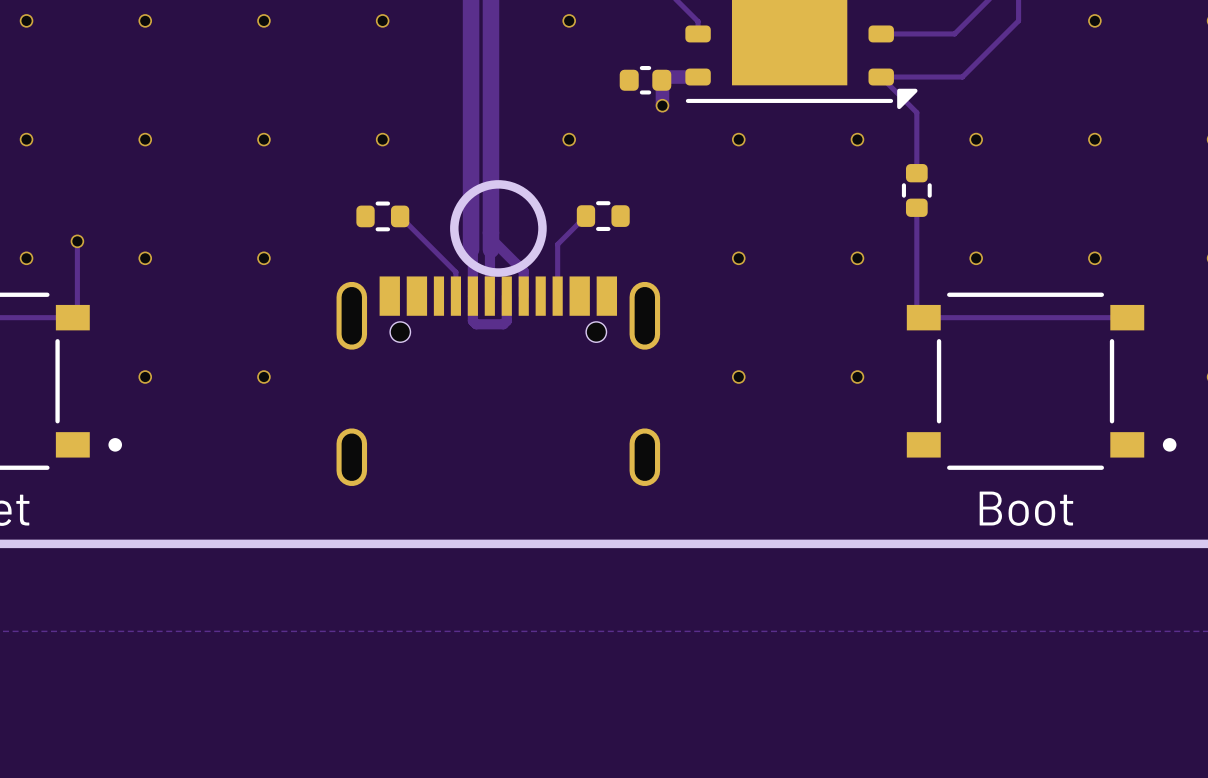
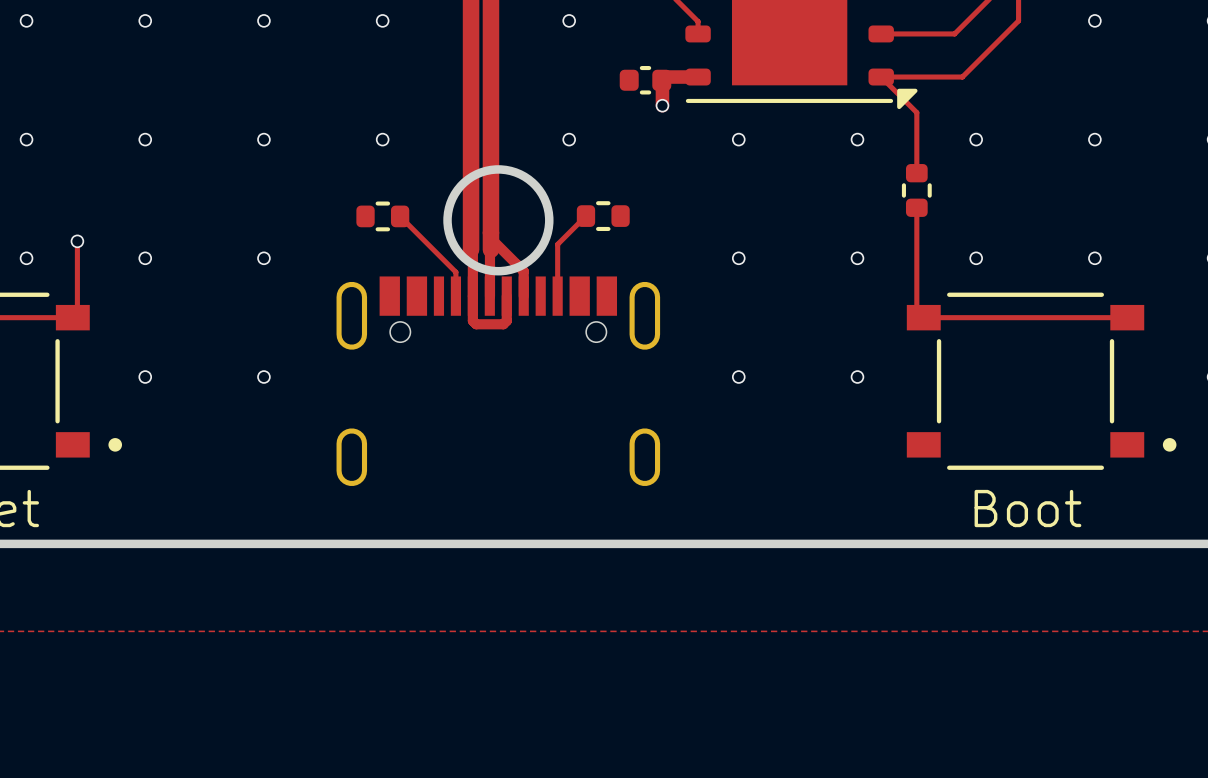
round board edge size: [450, 180, 547, 277] -> [443, 165, 554, 276]

